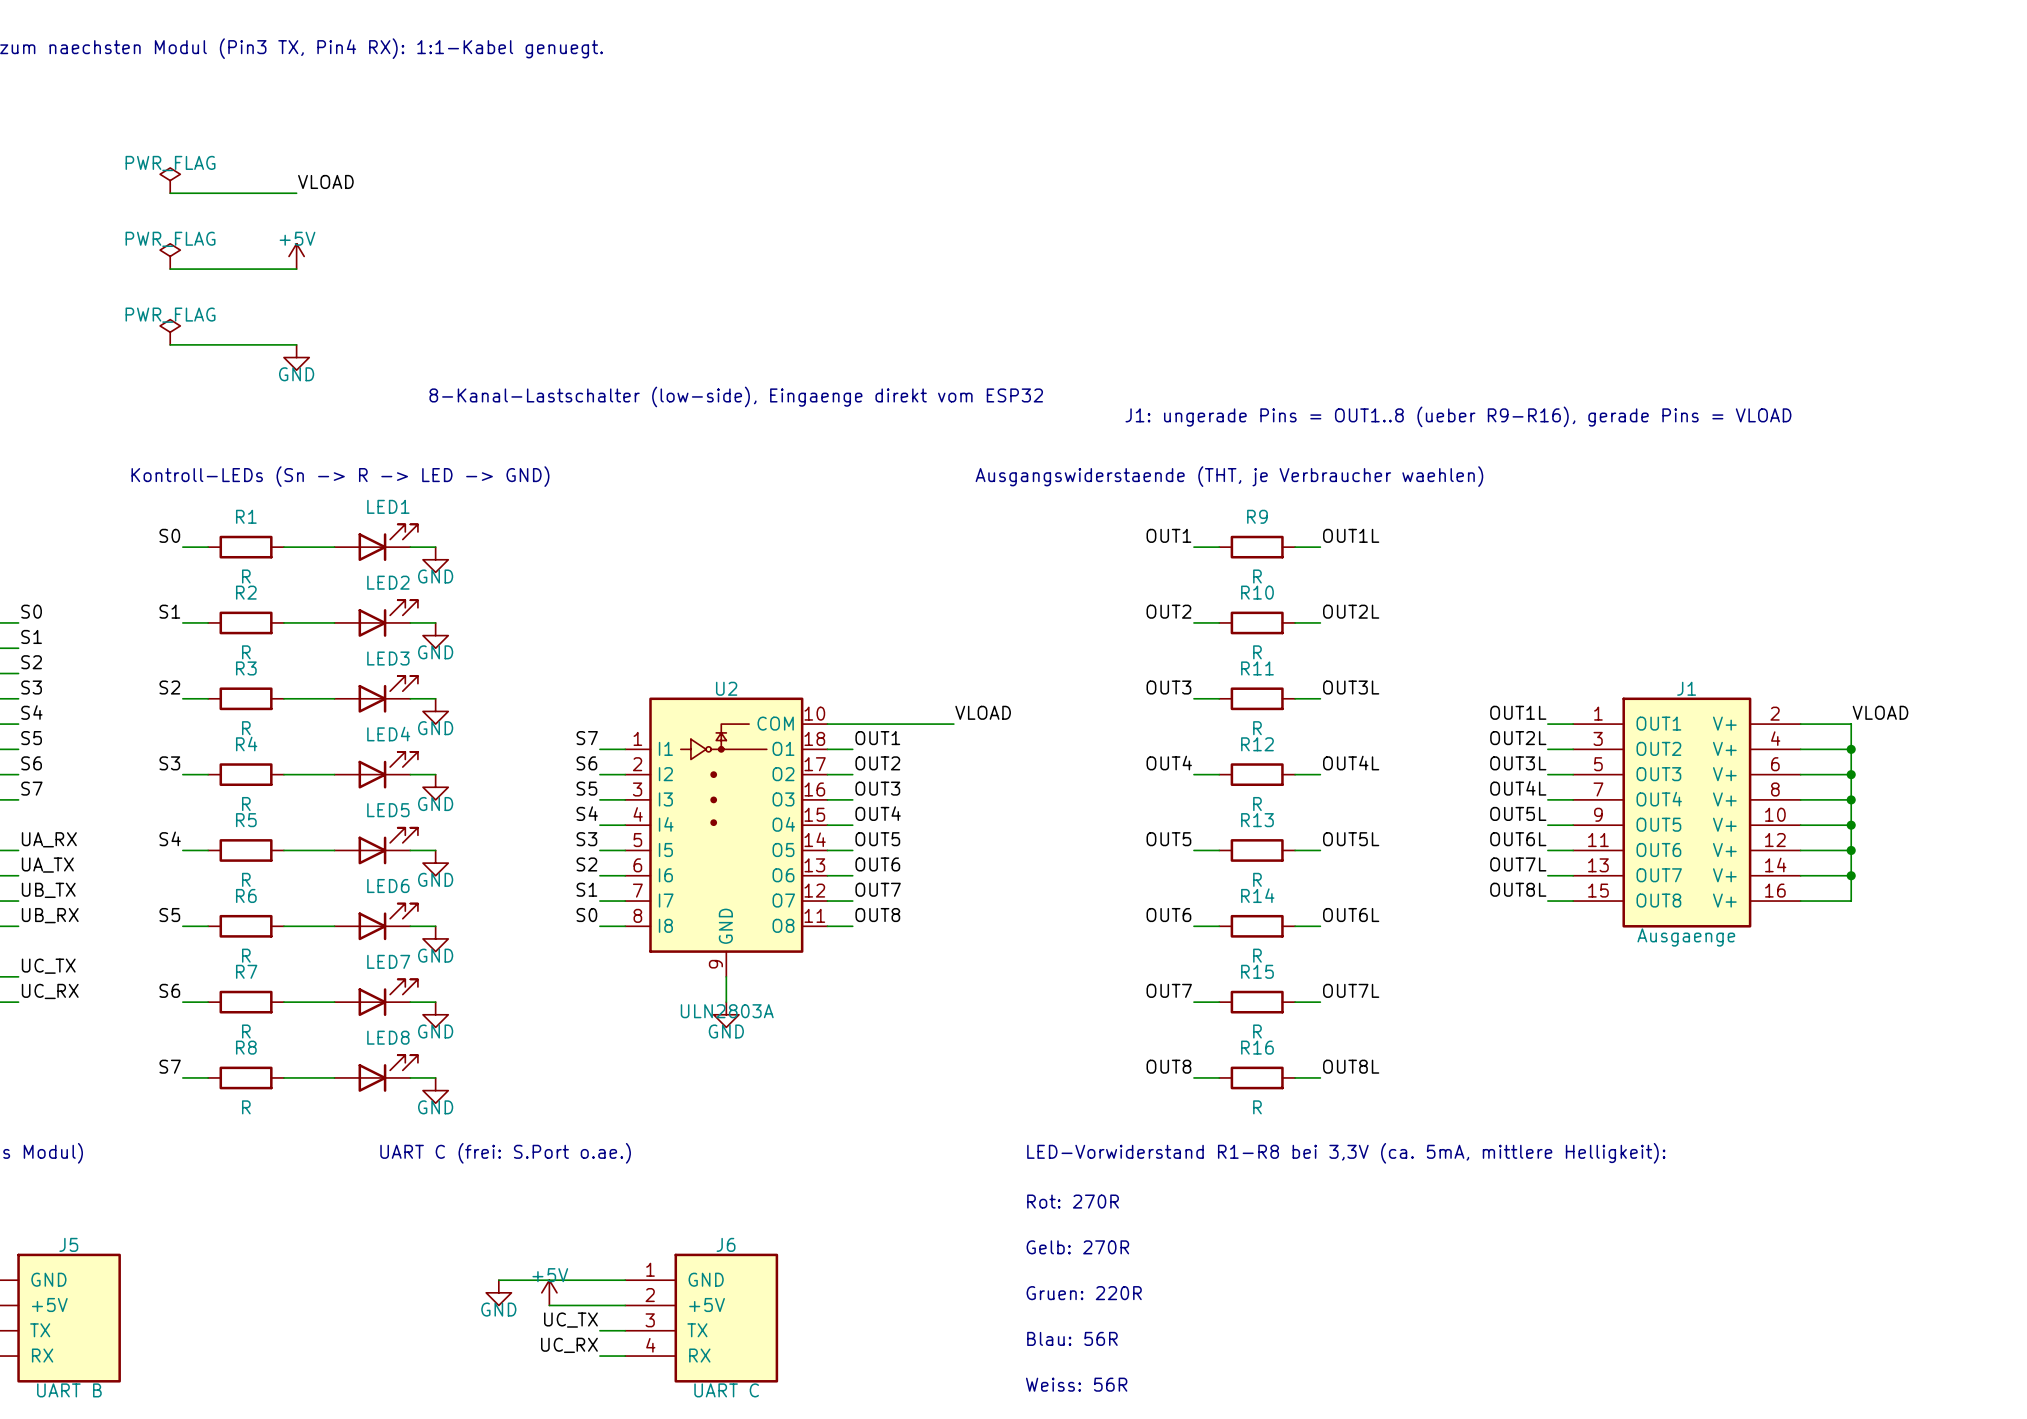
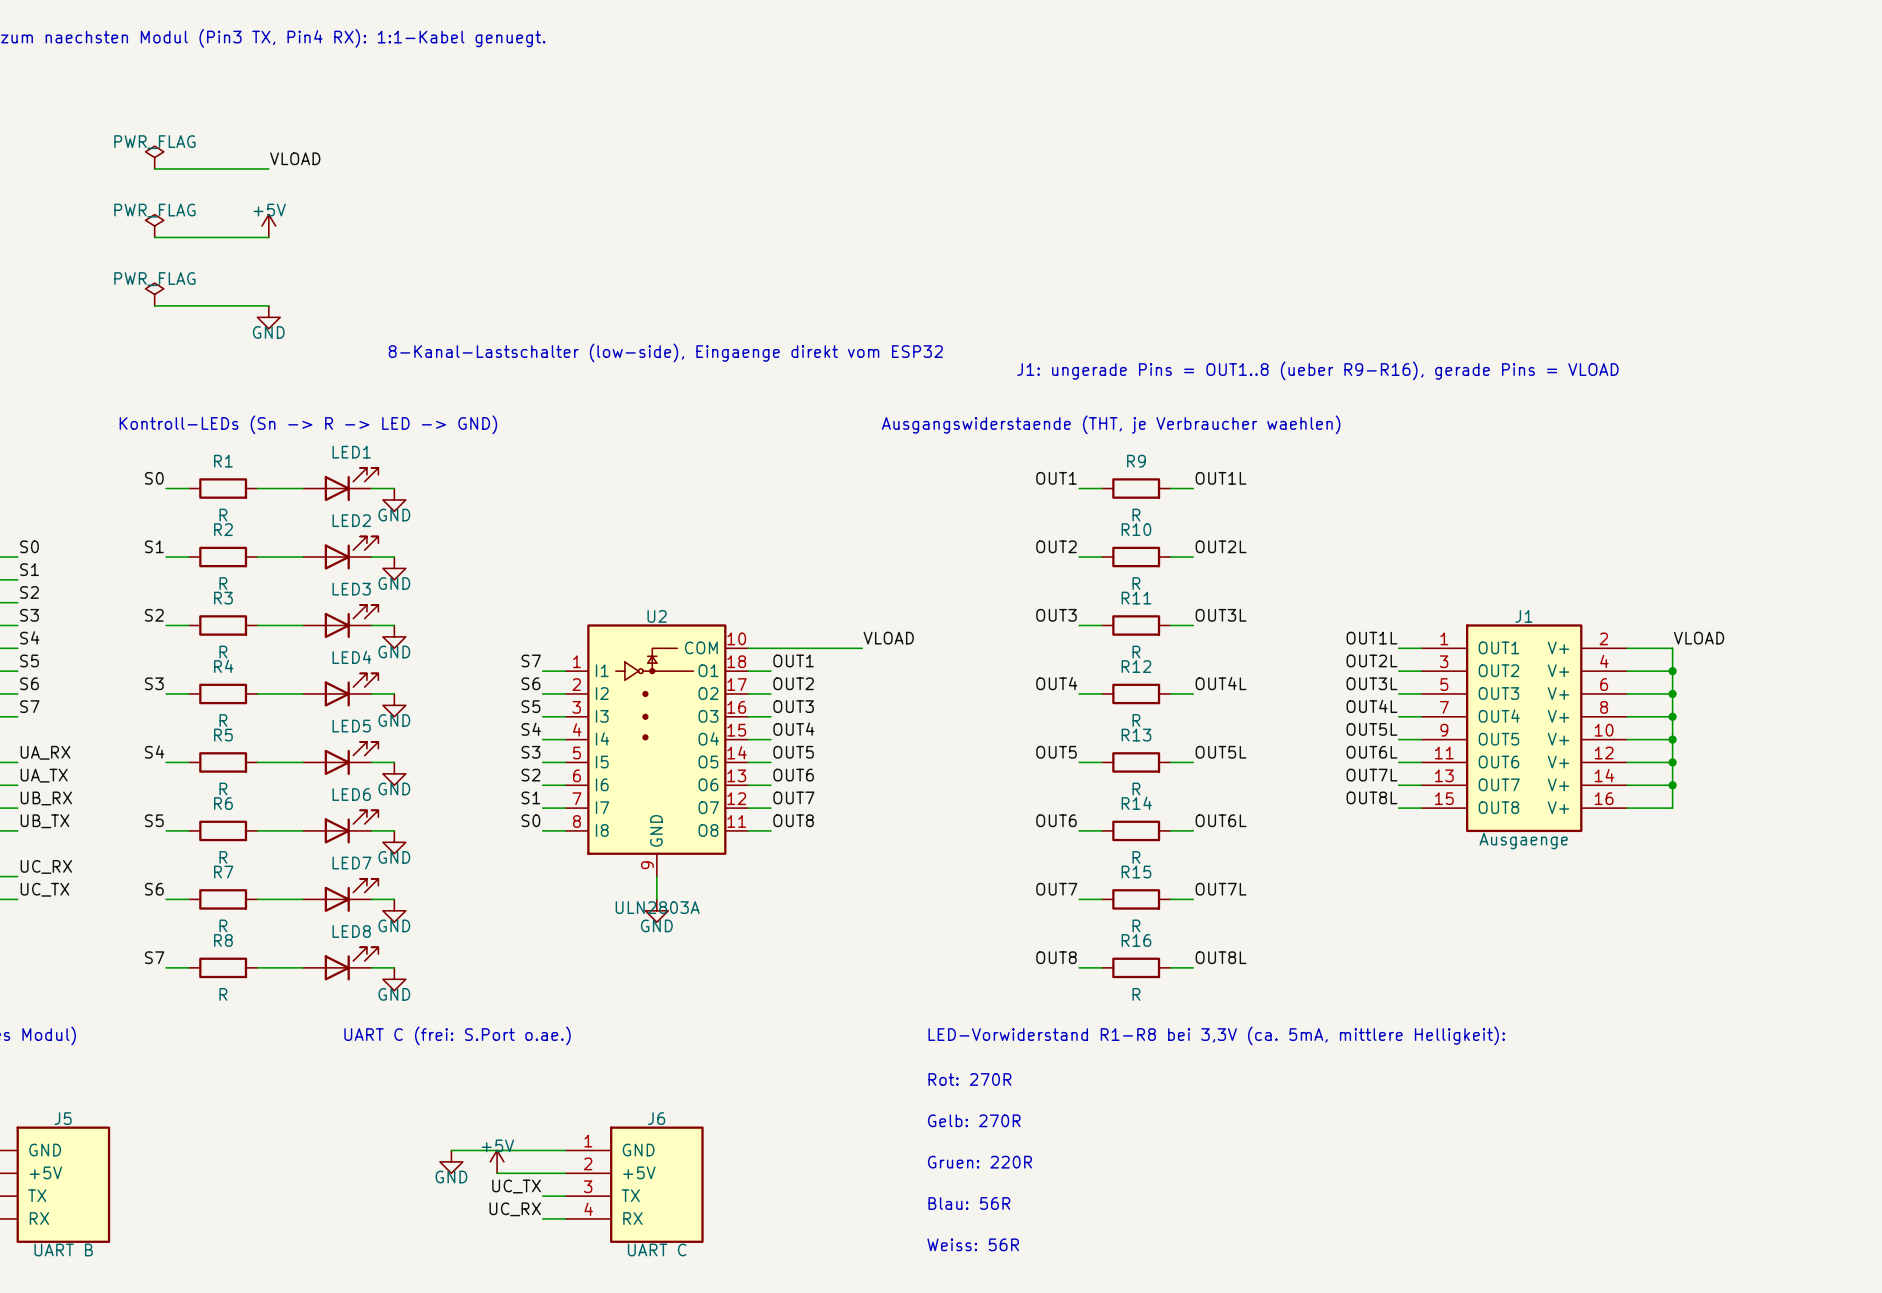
label: UB_TX (48, 890) -> UB_RX (46, 798)
label: UB_RX (50, 915) -> UB_TX (44, 821)
label: UC_TX (48, 966) -> UC_RX (46, 866)
label: UC_RX (50, 991) -> UC_TX (44, 889)

